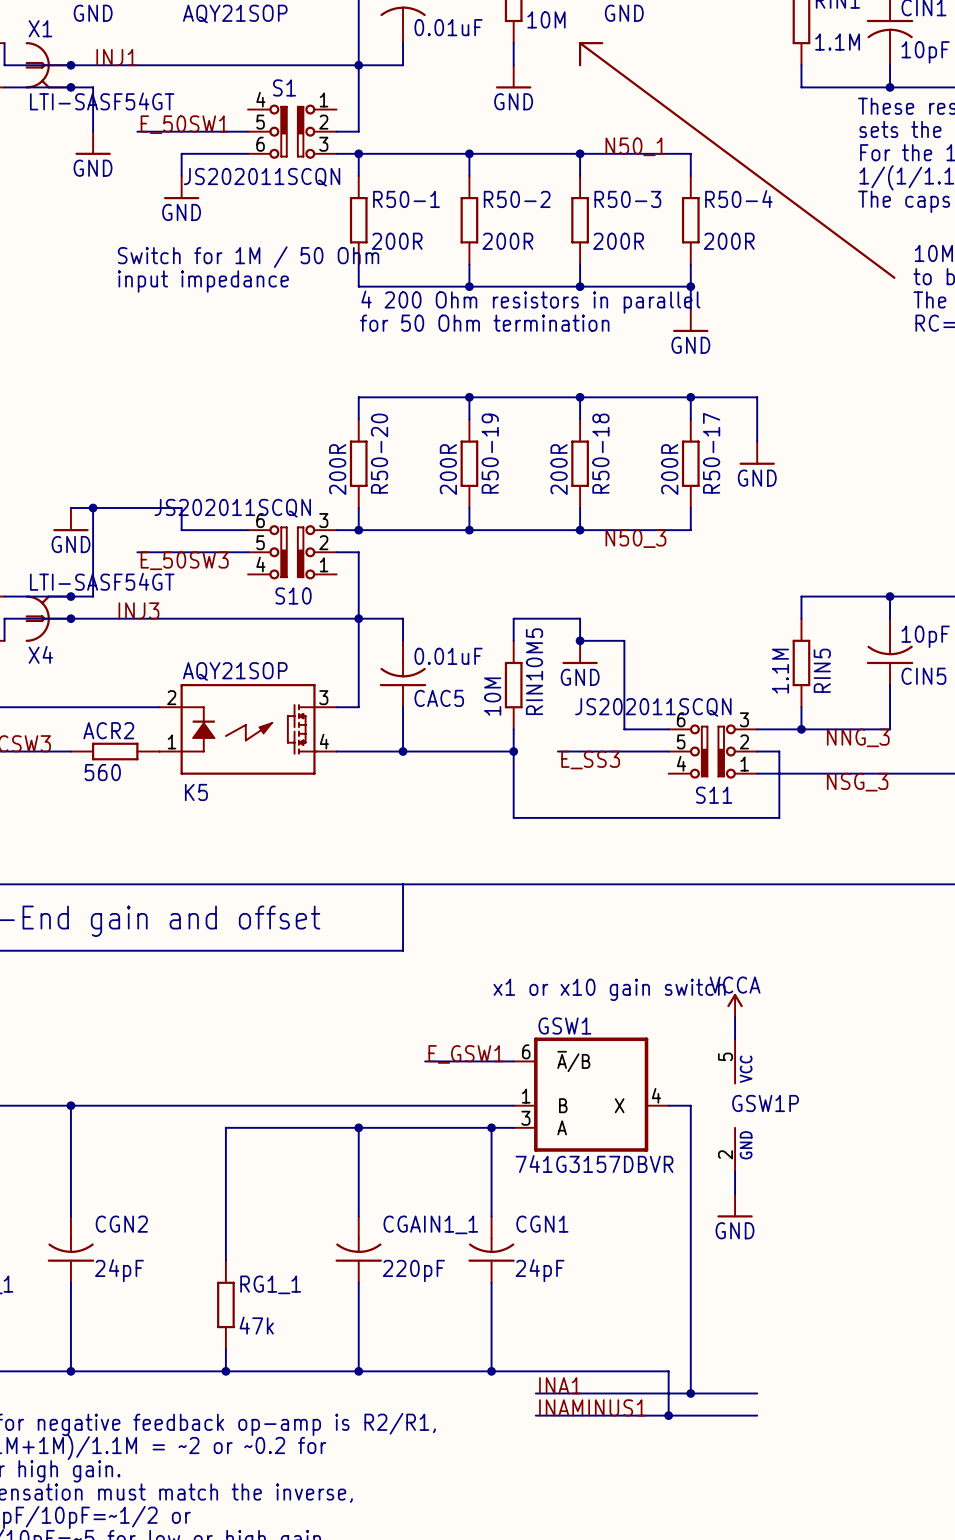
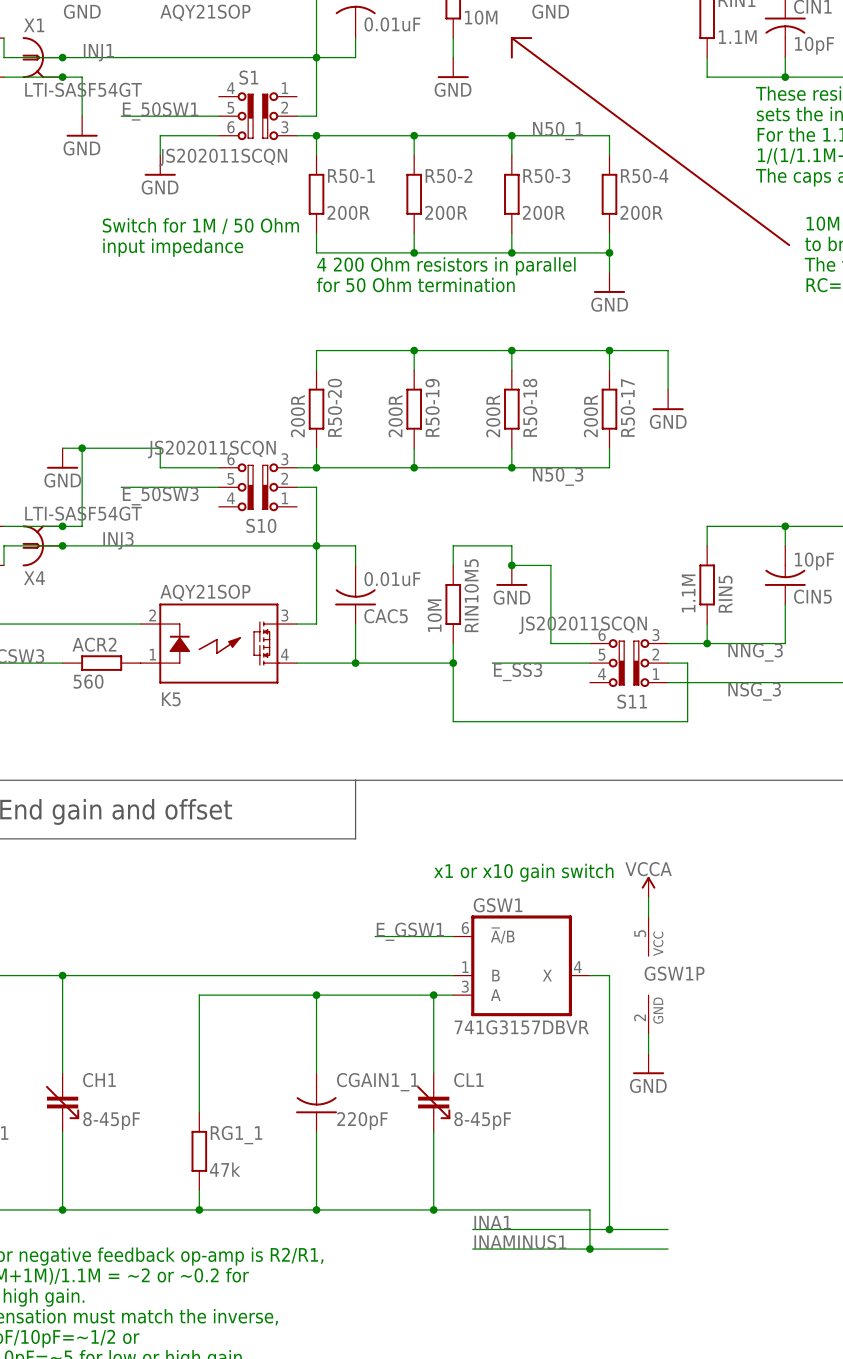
CGN2: 24pF (70, 1249) -> none
CH1: none -> 8-45pF (62, 1102)
CGN1: 24pF (491, 1249) -> none
CL1: none -> 8-45pF (433, 1102)

